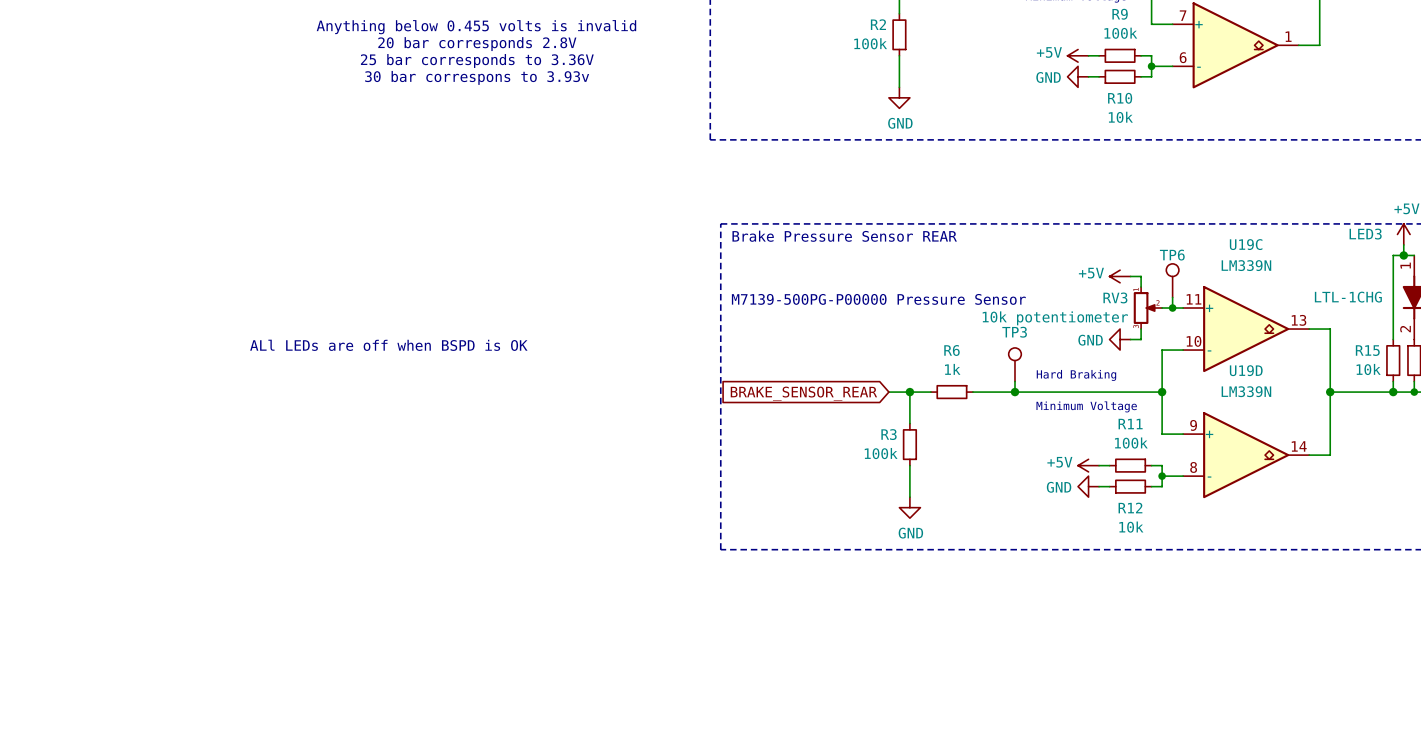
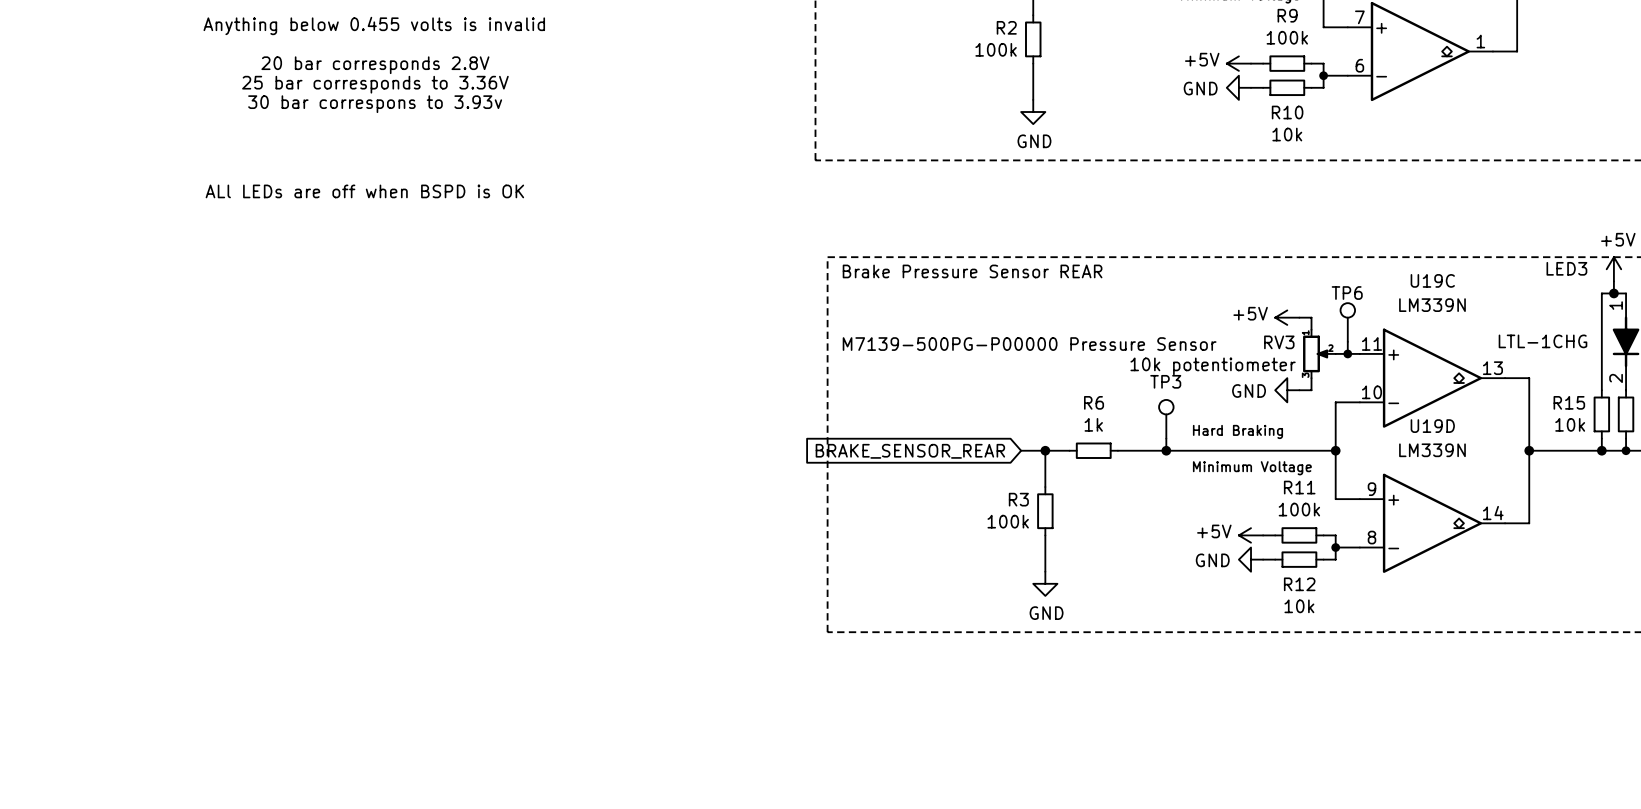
text position: Anything below 0.455 volts is invalid (476, 27) -> Anything below 0.455 volts is invalid (374, 25)
text position: 20 bar corresponds 2.8V (477, 44) -> 20 bar corresponds 2.8V (375, 65)
text position: 25 bar corresponds to 3.36V (477, 60) -> 25 bar corresponds to 3.36V (375, 84)
text position: 30 bar correspons to 3.93v (477, 77) -> 30 bar correspons to 3.93v (375, 104)
text position: ALl LEDs are off when BSPD is OK (388, 345) -> ALl LEDs are off when BSPD is OK (364, 191)

